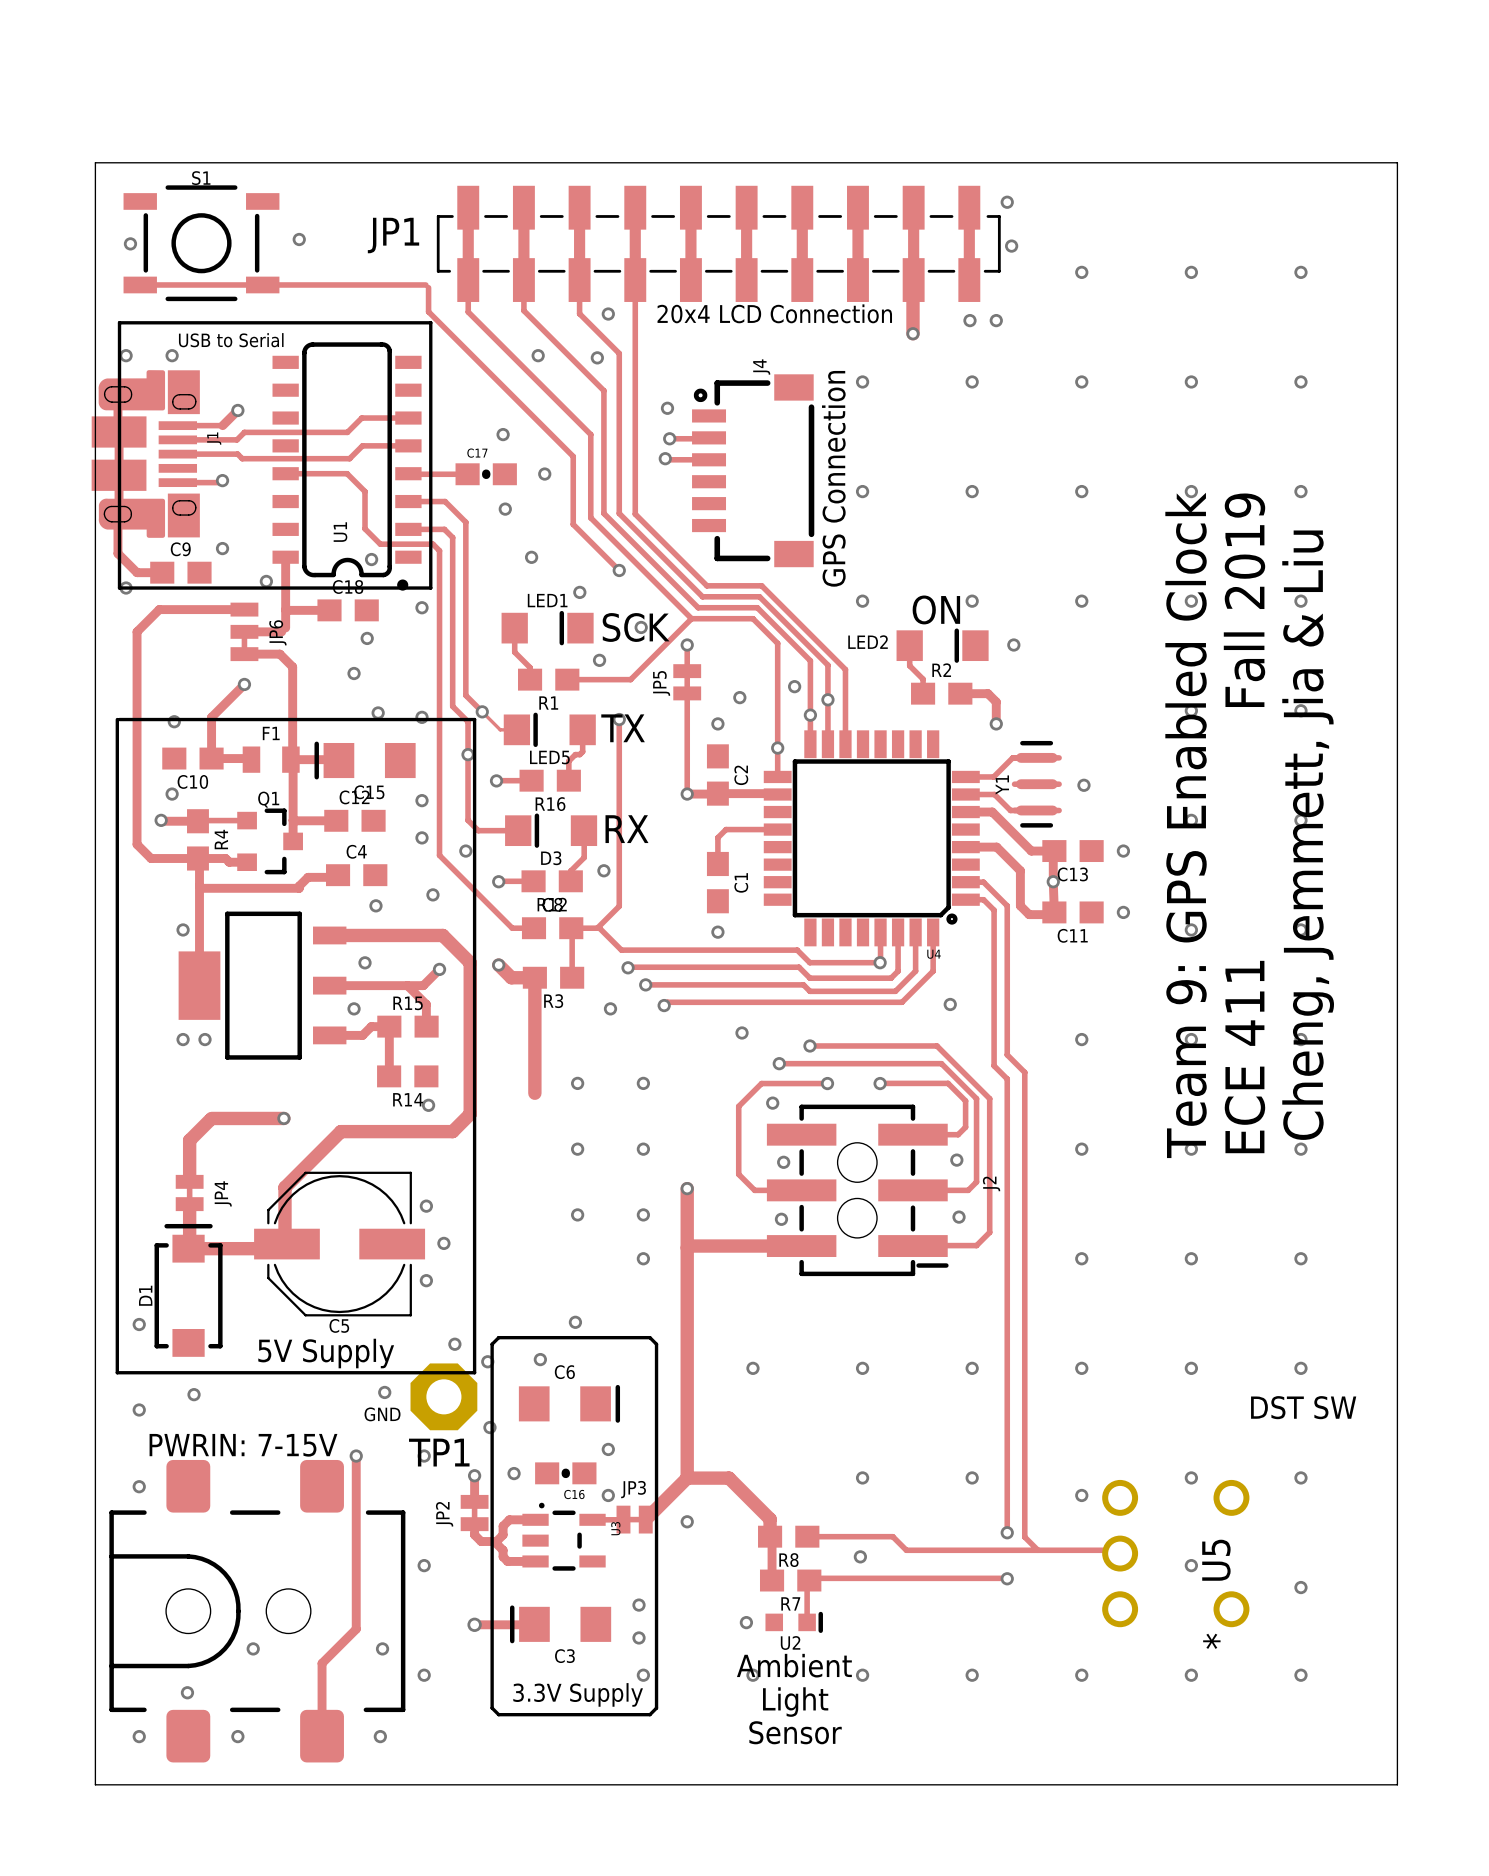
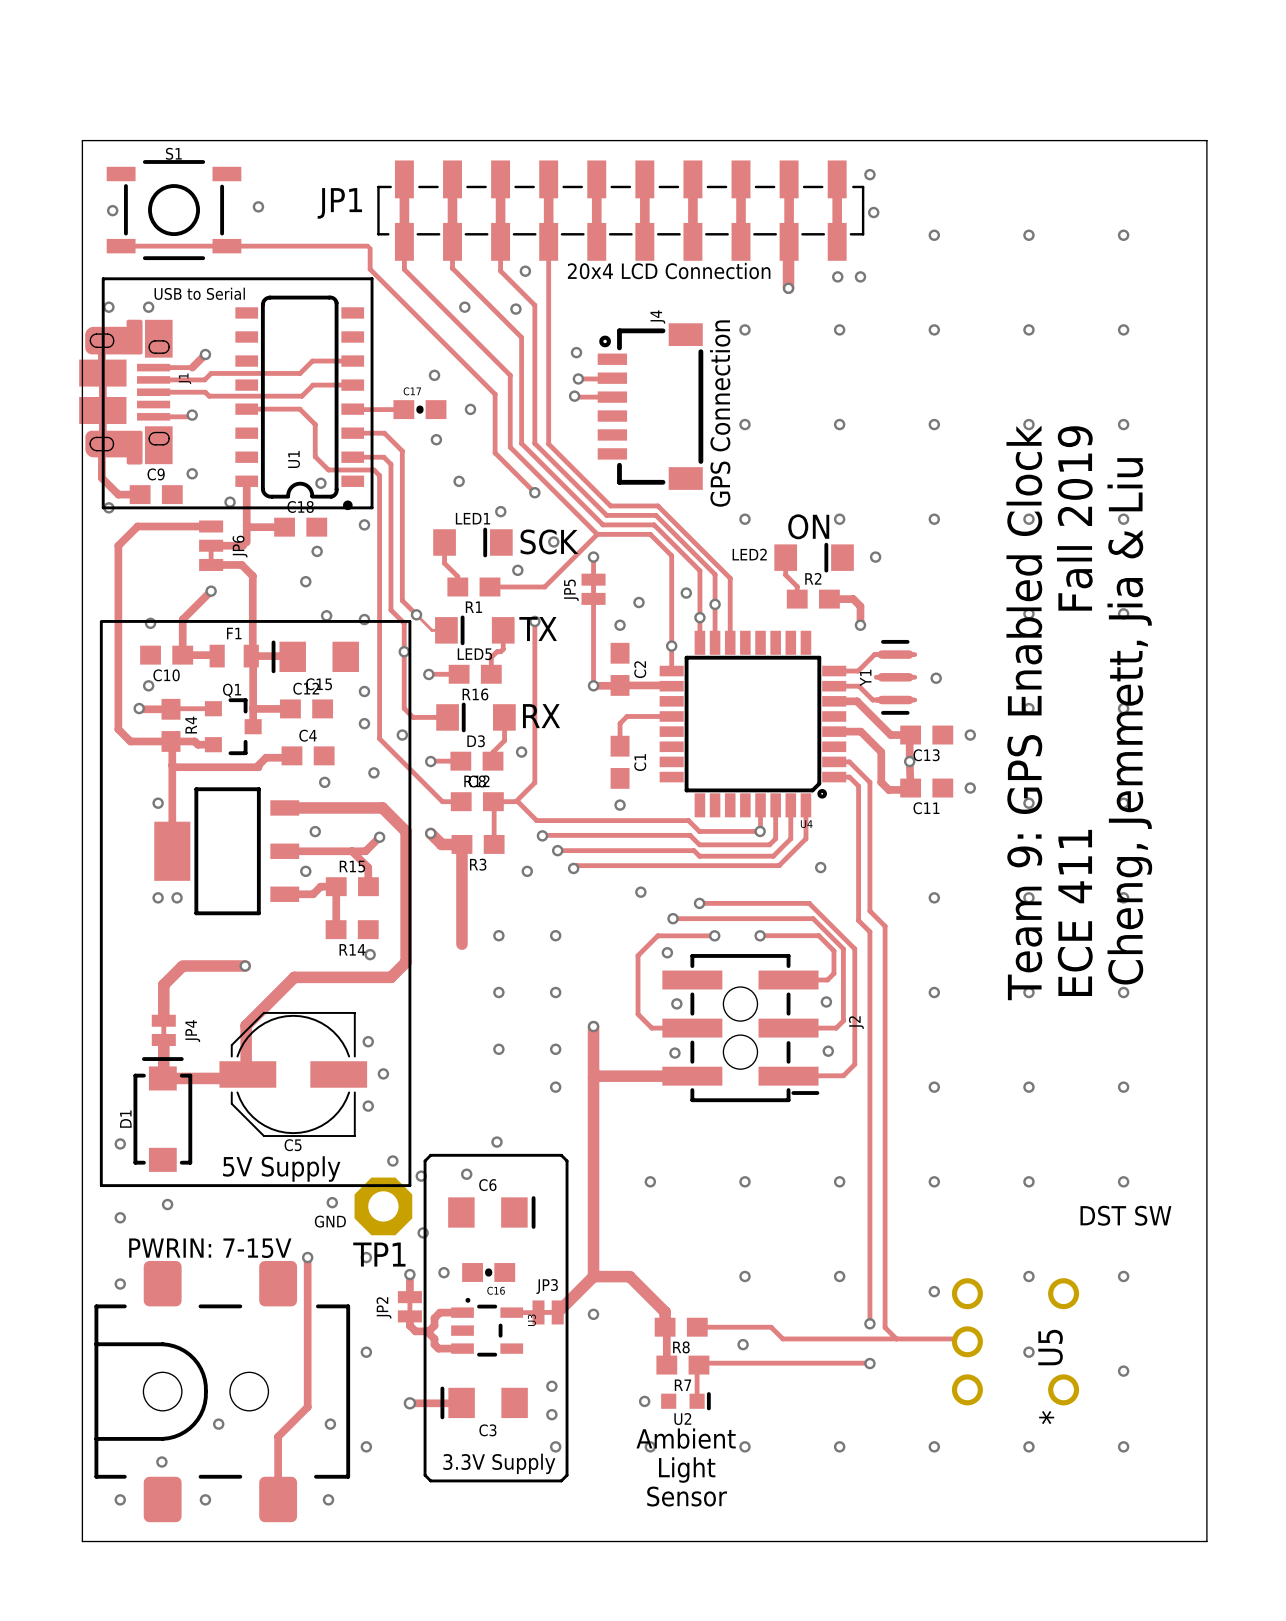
via: (608, 1449) -> none
via: (608, 1495) -> none

